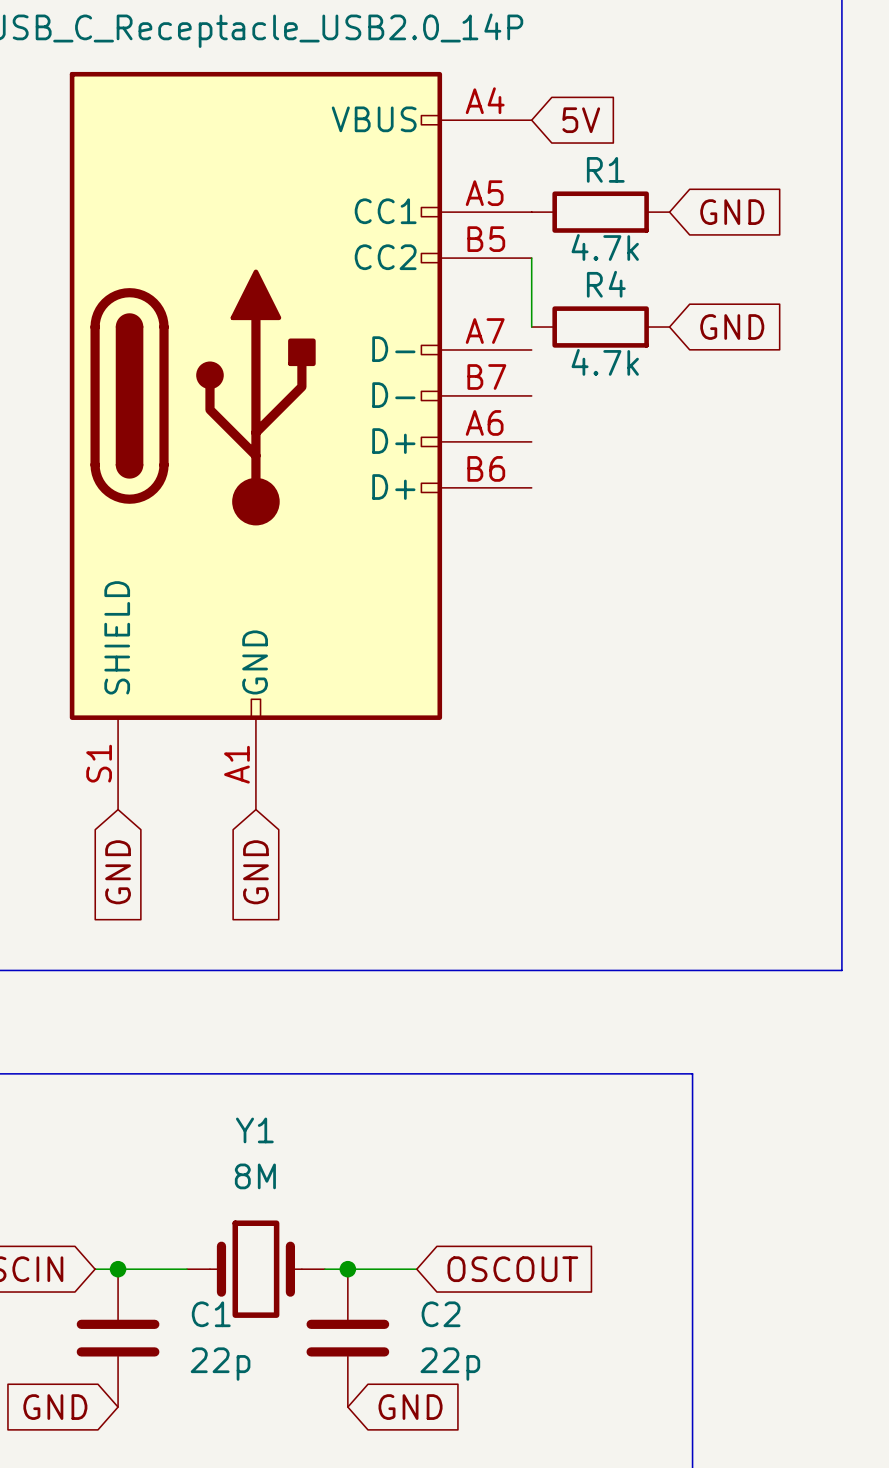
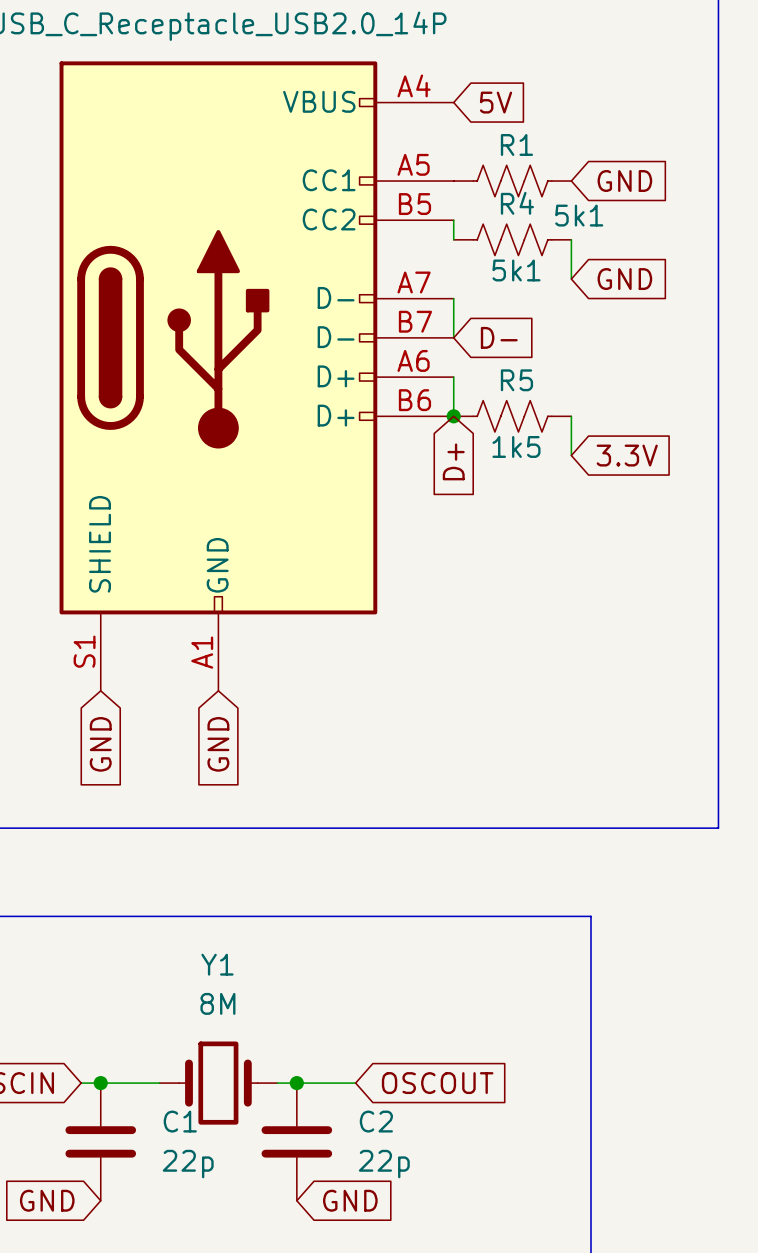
R1 symbol: [531, 191, 670, 233] -> [453, 165, 572, 197]
R1 value: 4.7k (605, 247) -> 5k1 (579, 215)
wire: (531, 281) (531, 327) -> (453, 298) (453, 337)
wire: none -> (571, 239) (571, 279)
R4 symbol: [531, 306, 670, 348] -> [453, 224, 572, 256]
R4 value: 4.7k (605, 362) -> 5k1 (516, 270)
global label: none -> D- (499, 337)
wire: none -> (453, 377) (453, 416)
junction: none -> (453, 416)
R5: none -> 1k5 (512, 416)
wire: none -> (571, 416) (571, 455)
global label: none -> 3.3V (627, 455)
global label: none -> D+ (453, 461)

